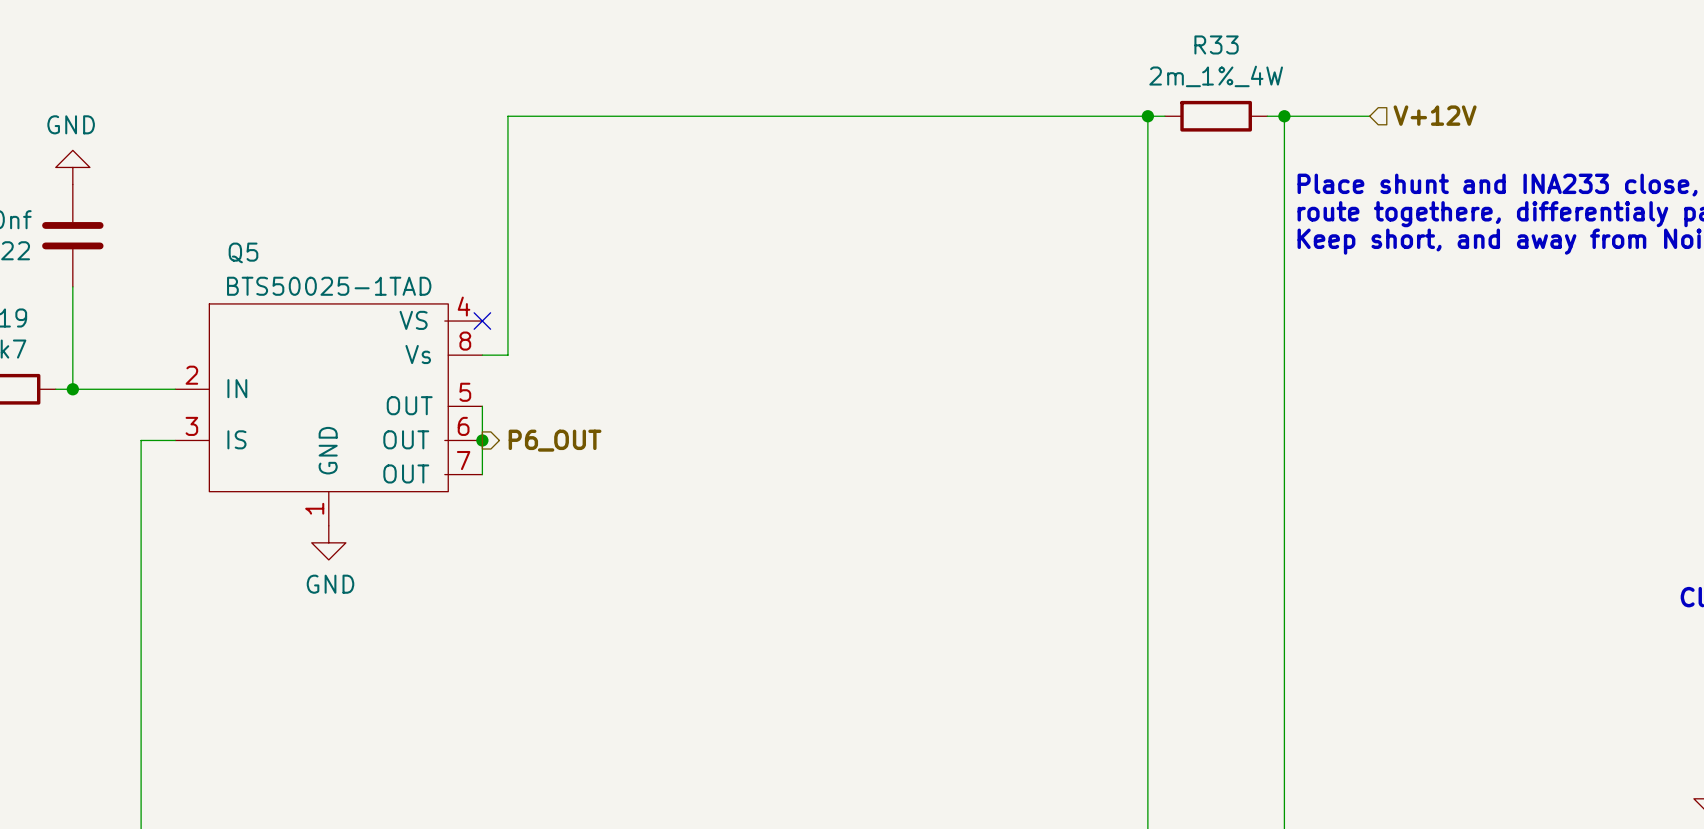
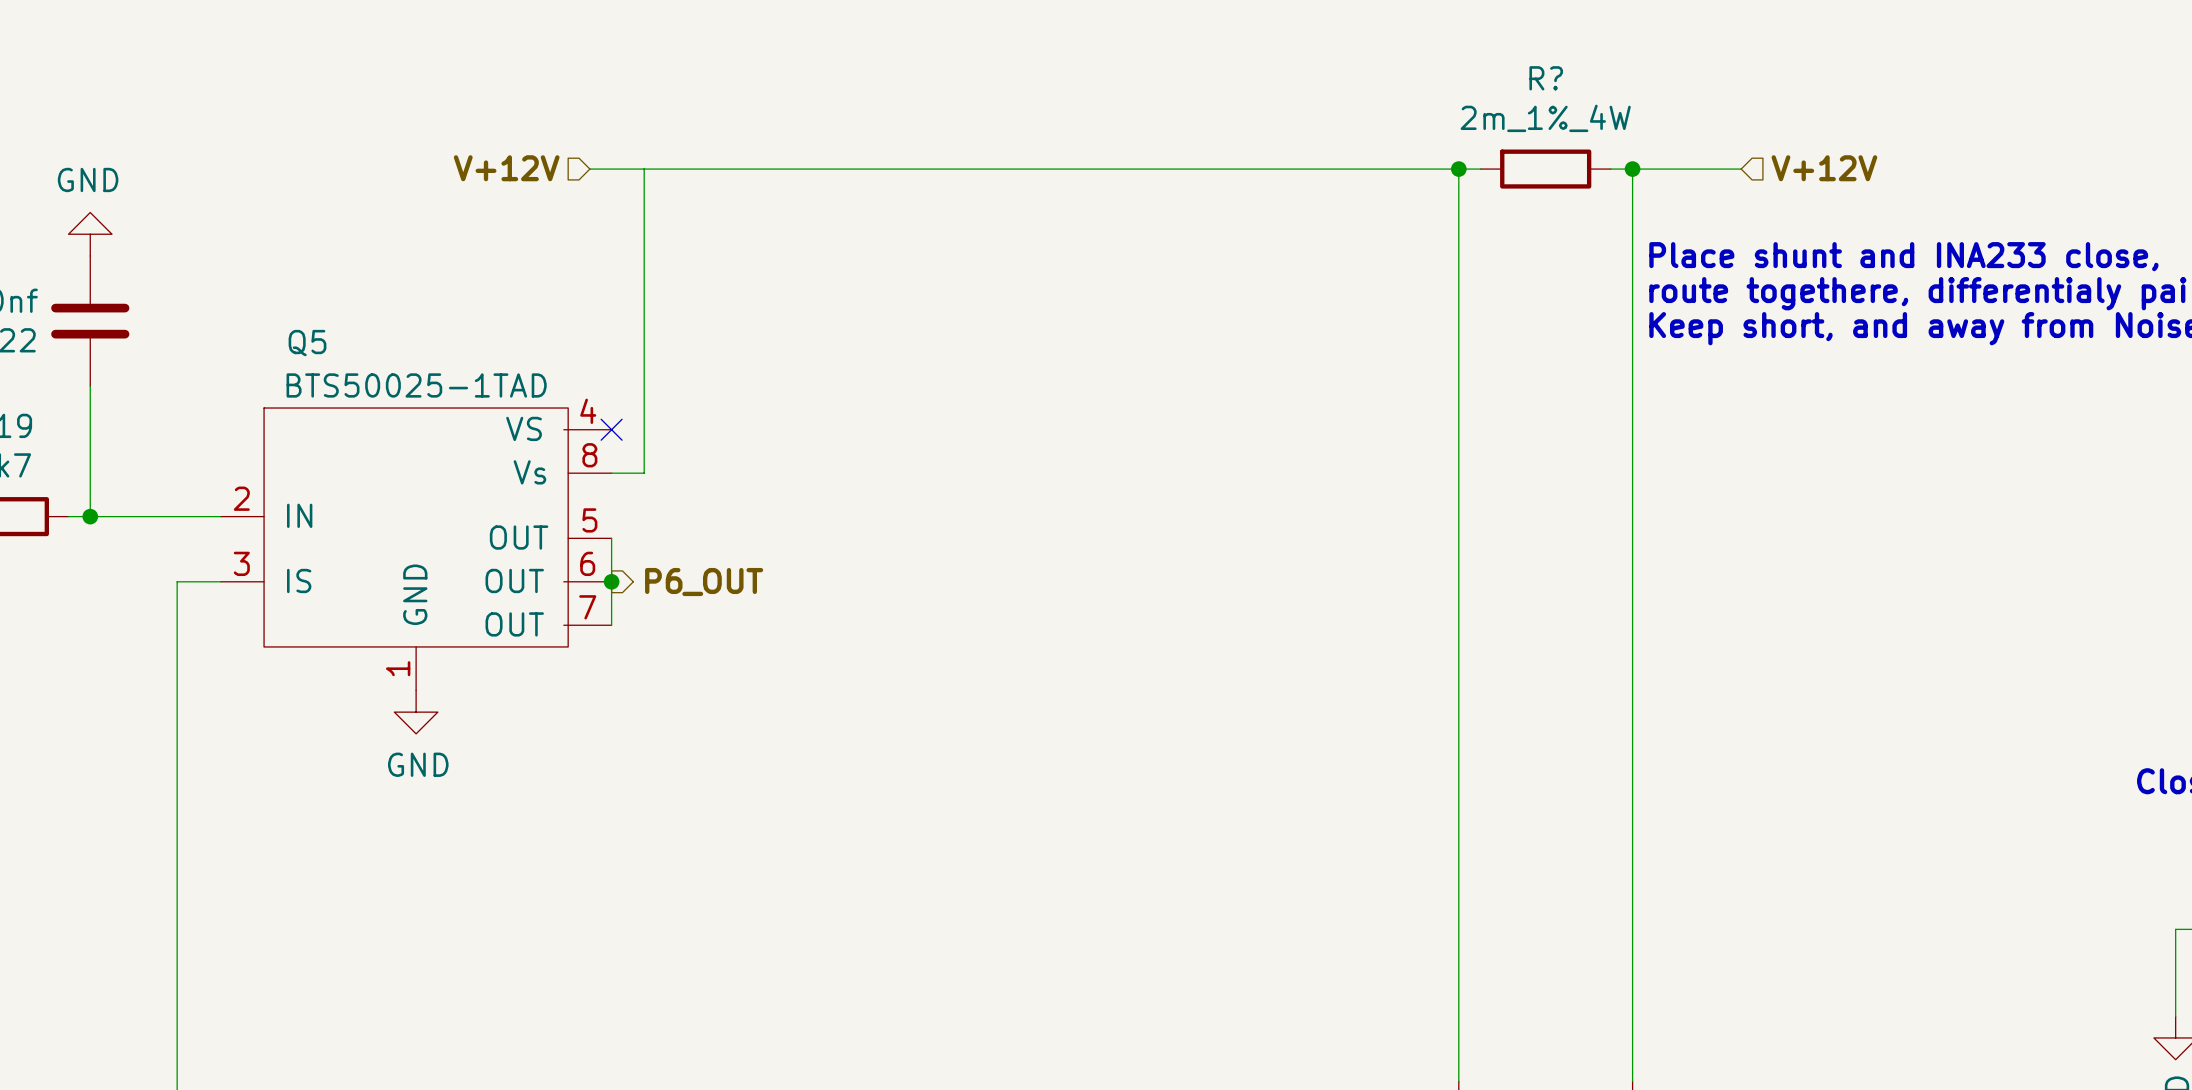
R33 name: R33 (1216, 44) -> R? (1546, 78)
hierarchical label: none -> V+12V (506, 168)
wire: none -> (589, 169) (644, 169)

